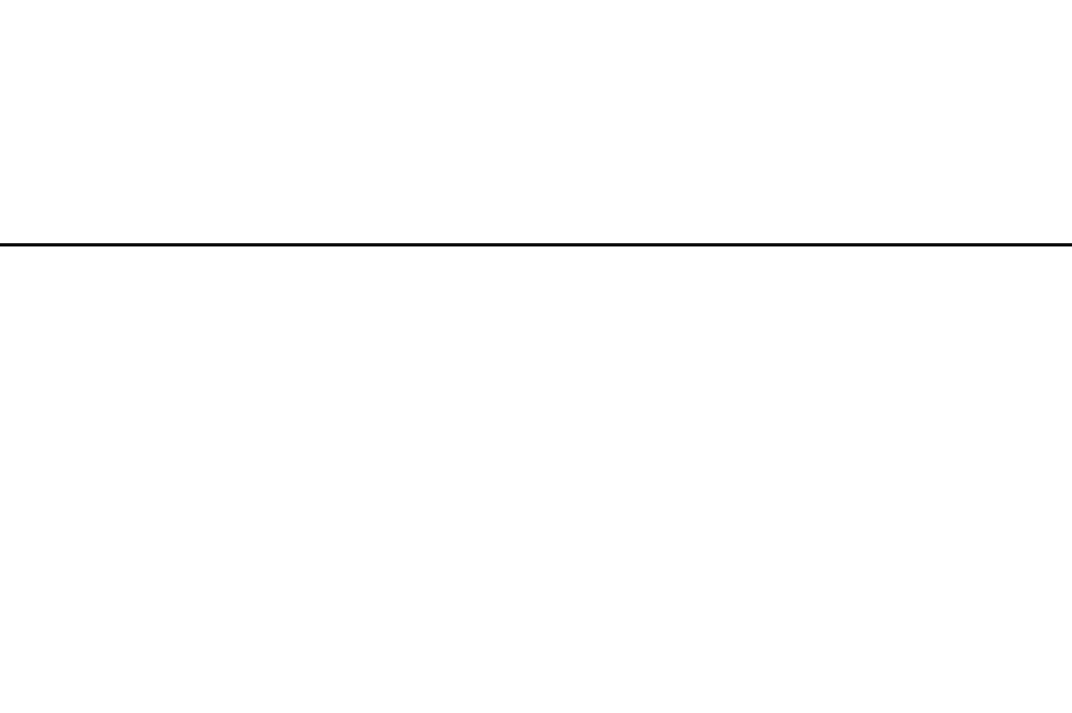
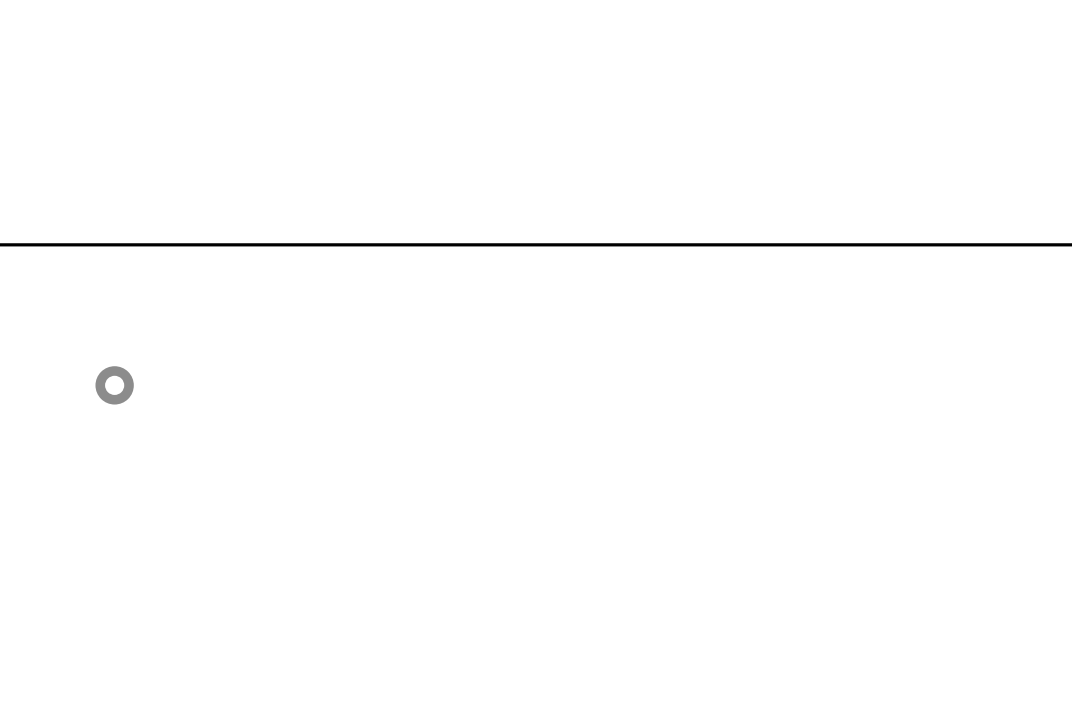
via: none -> (114, 385)

